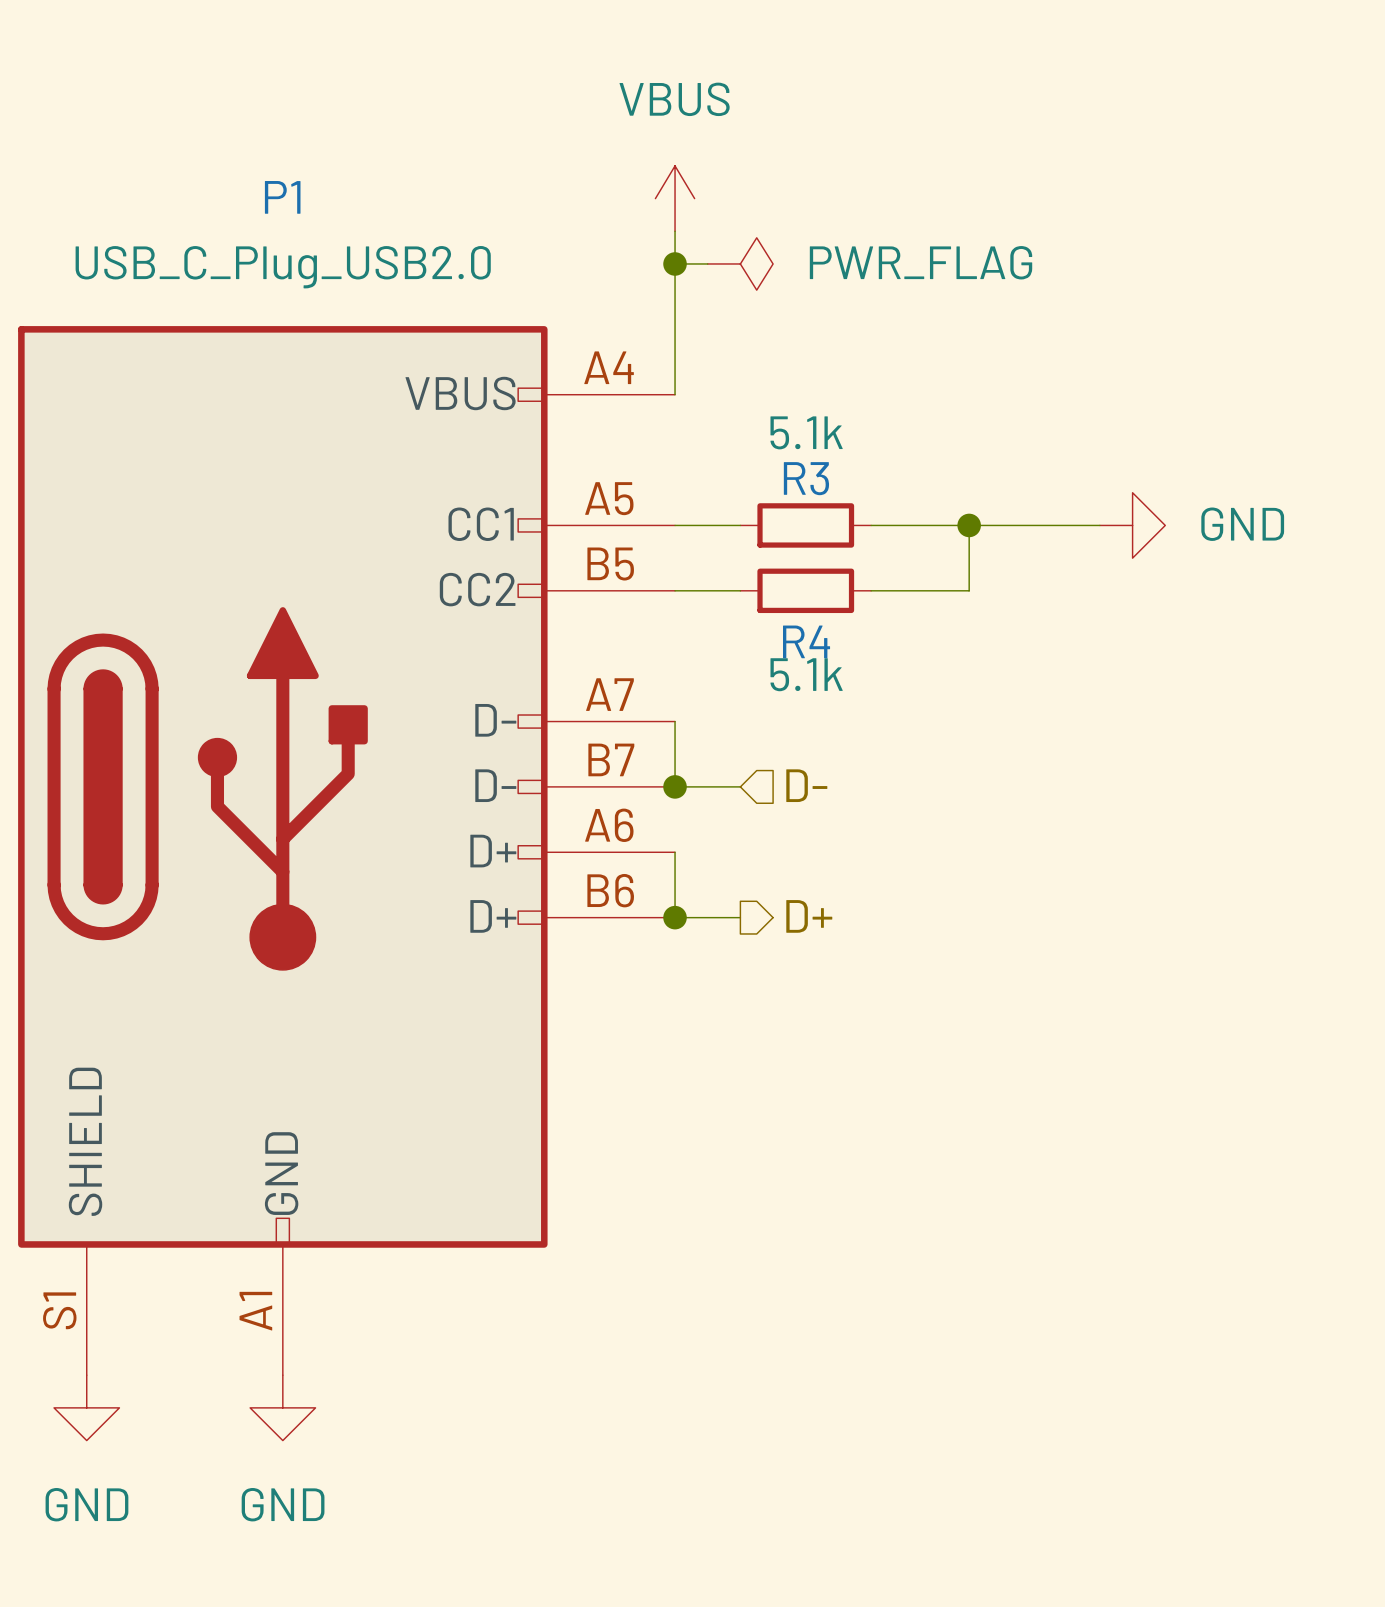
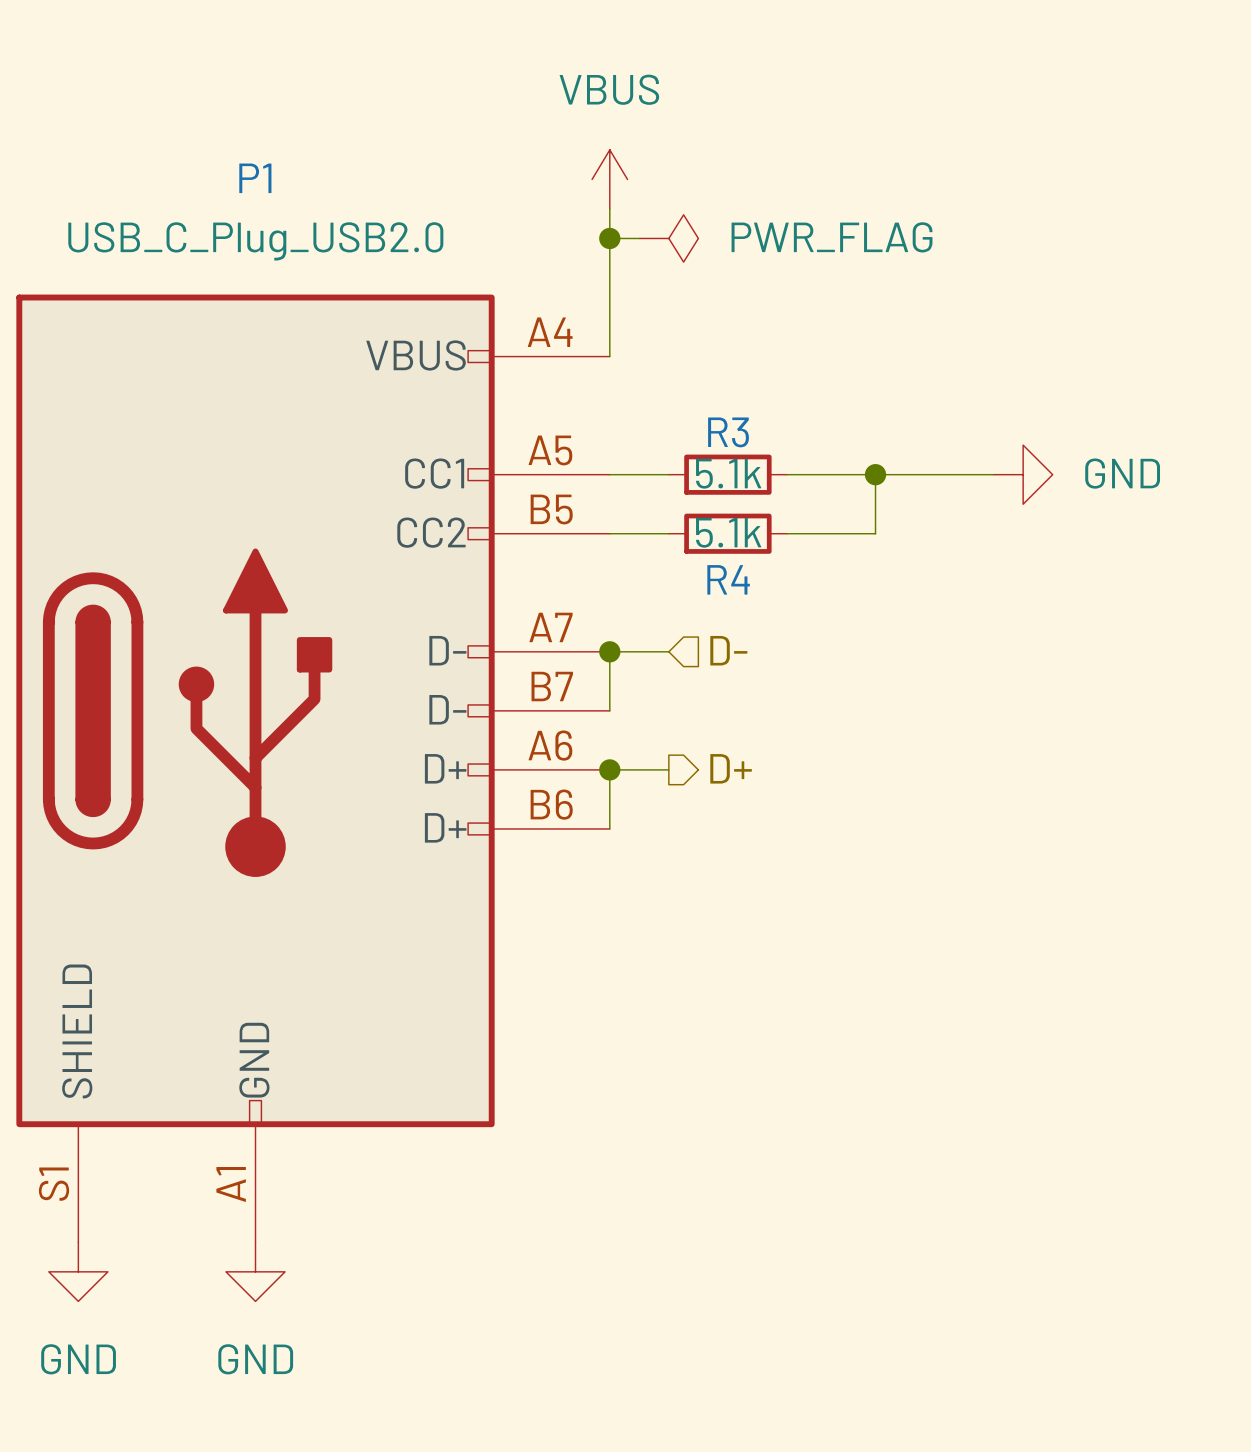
R3 value position: 5.1k (806, 432) -> 5.1k (728, 473)
R4 value position: 5.1k (806, 674) -> 5.1k (728, 532)
junction: none -> (609, 651)
hierarchical label position: D- (806, 785) -> D- (728, 650)
wire: (675, 786) (740, 786) -> (609, 651) (668, 651)
junction: (675, 786) -> none
junction: none -> (609, 769)
hierarchical label position: D+ (809, 916) -> D+ (731, 768)
wire: (675, 917) (740, 917) -> (609, 769) (668, 769)
junction: (675, 917) -> none

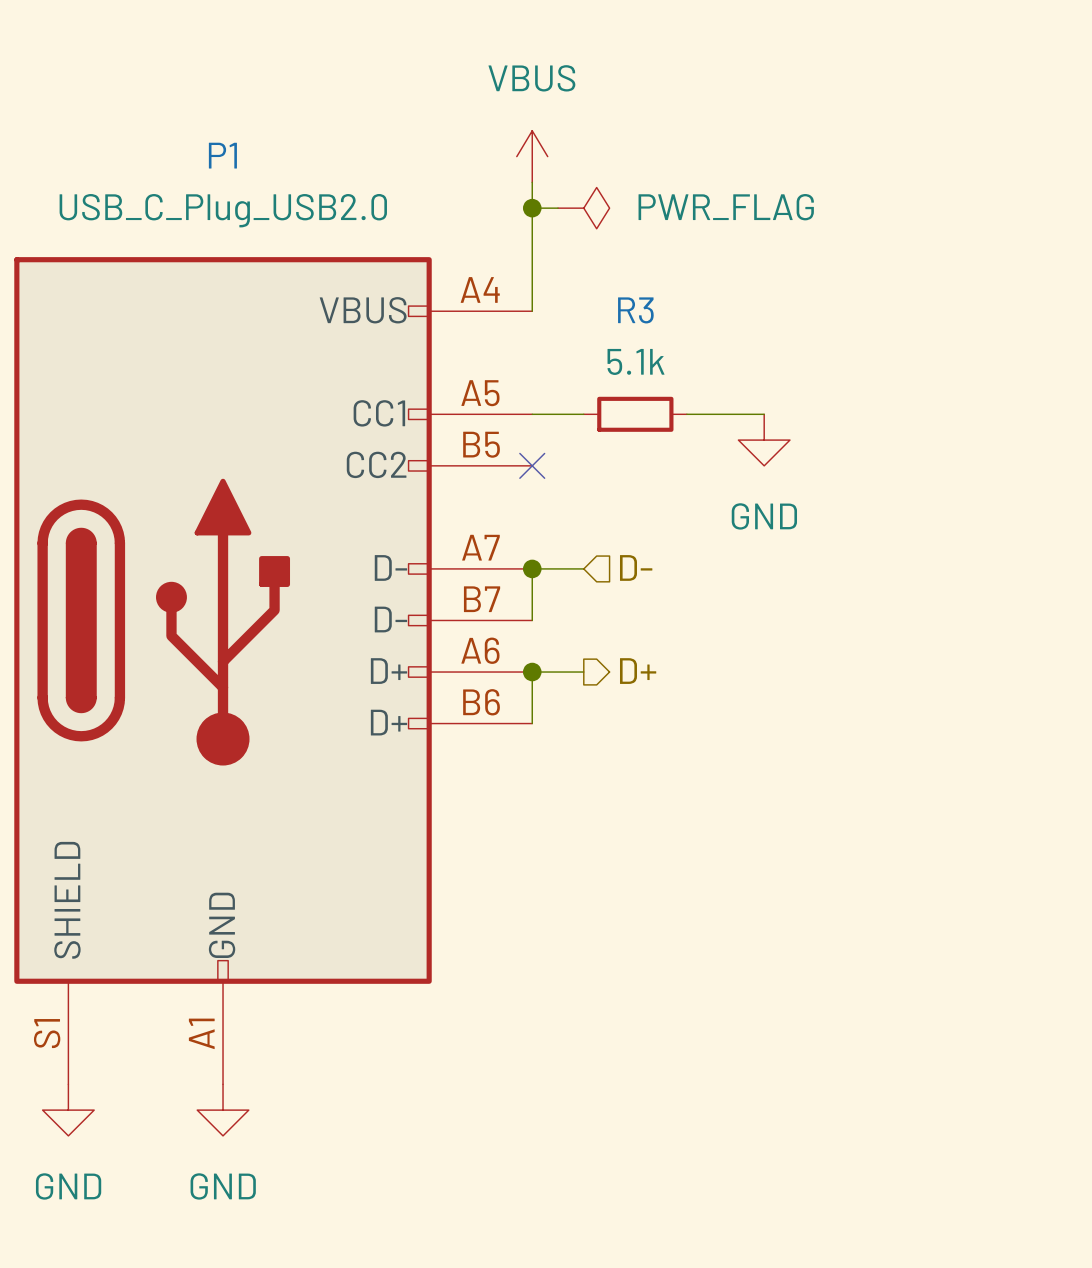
R3 name position: R3 (728, 432) -> R3 (635, 310)
R3 value position: 5.1k (728, 473) -> 5.1k (636, 361)
junction: (875, 474) -> none
wire: (993, 474) (875, 474) (875, 533) (786, 533) -> none
power symbol rotation: 0° (1023, 474) -> 90° clockwise (764, 440)
power symbol position: GND (1023, 474) -> GND (764, 440)
wire: (609, 533) (668, 533) -> none
no-connect mark: none -> (532, 465)
R4: 5.1k (727, 533) -> none

